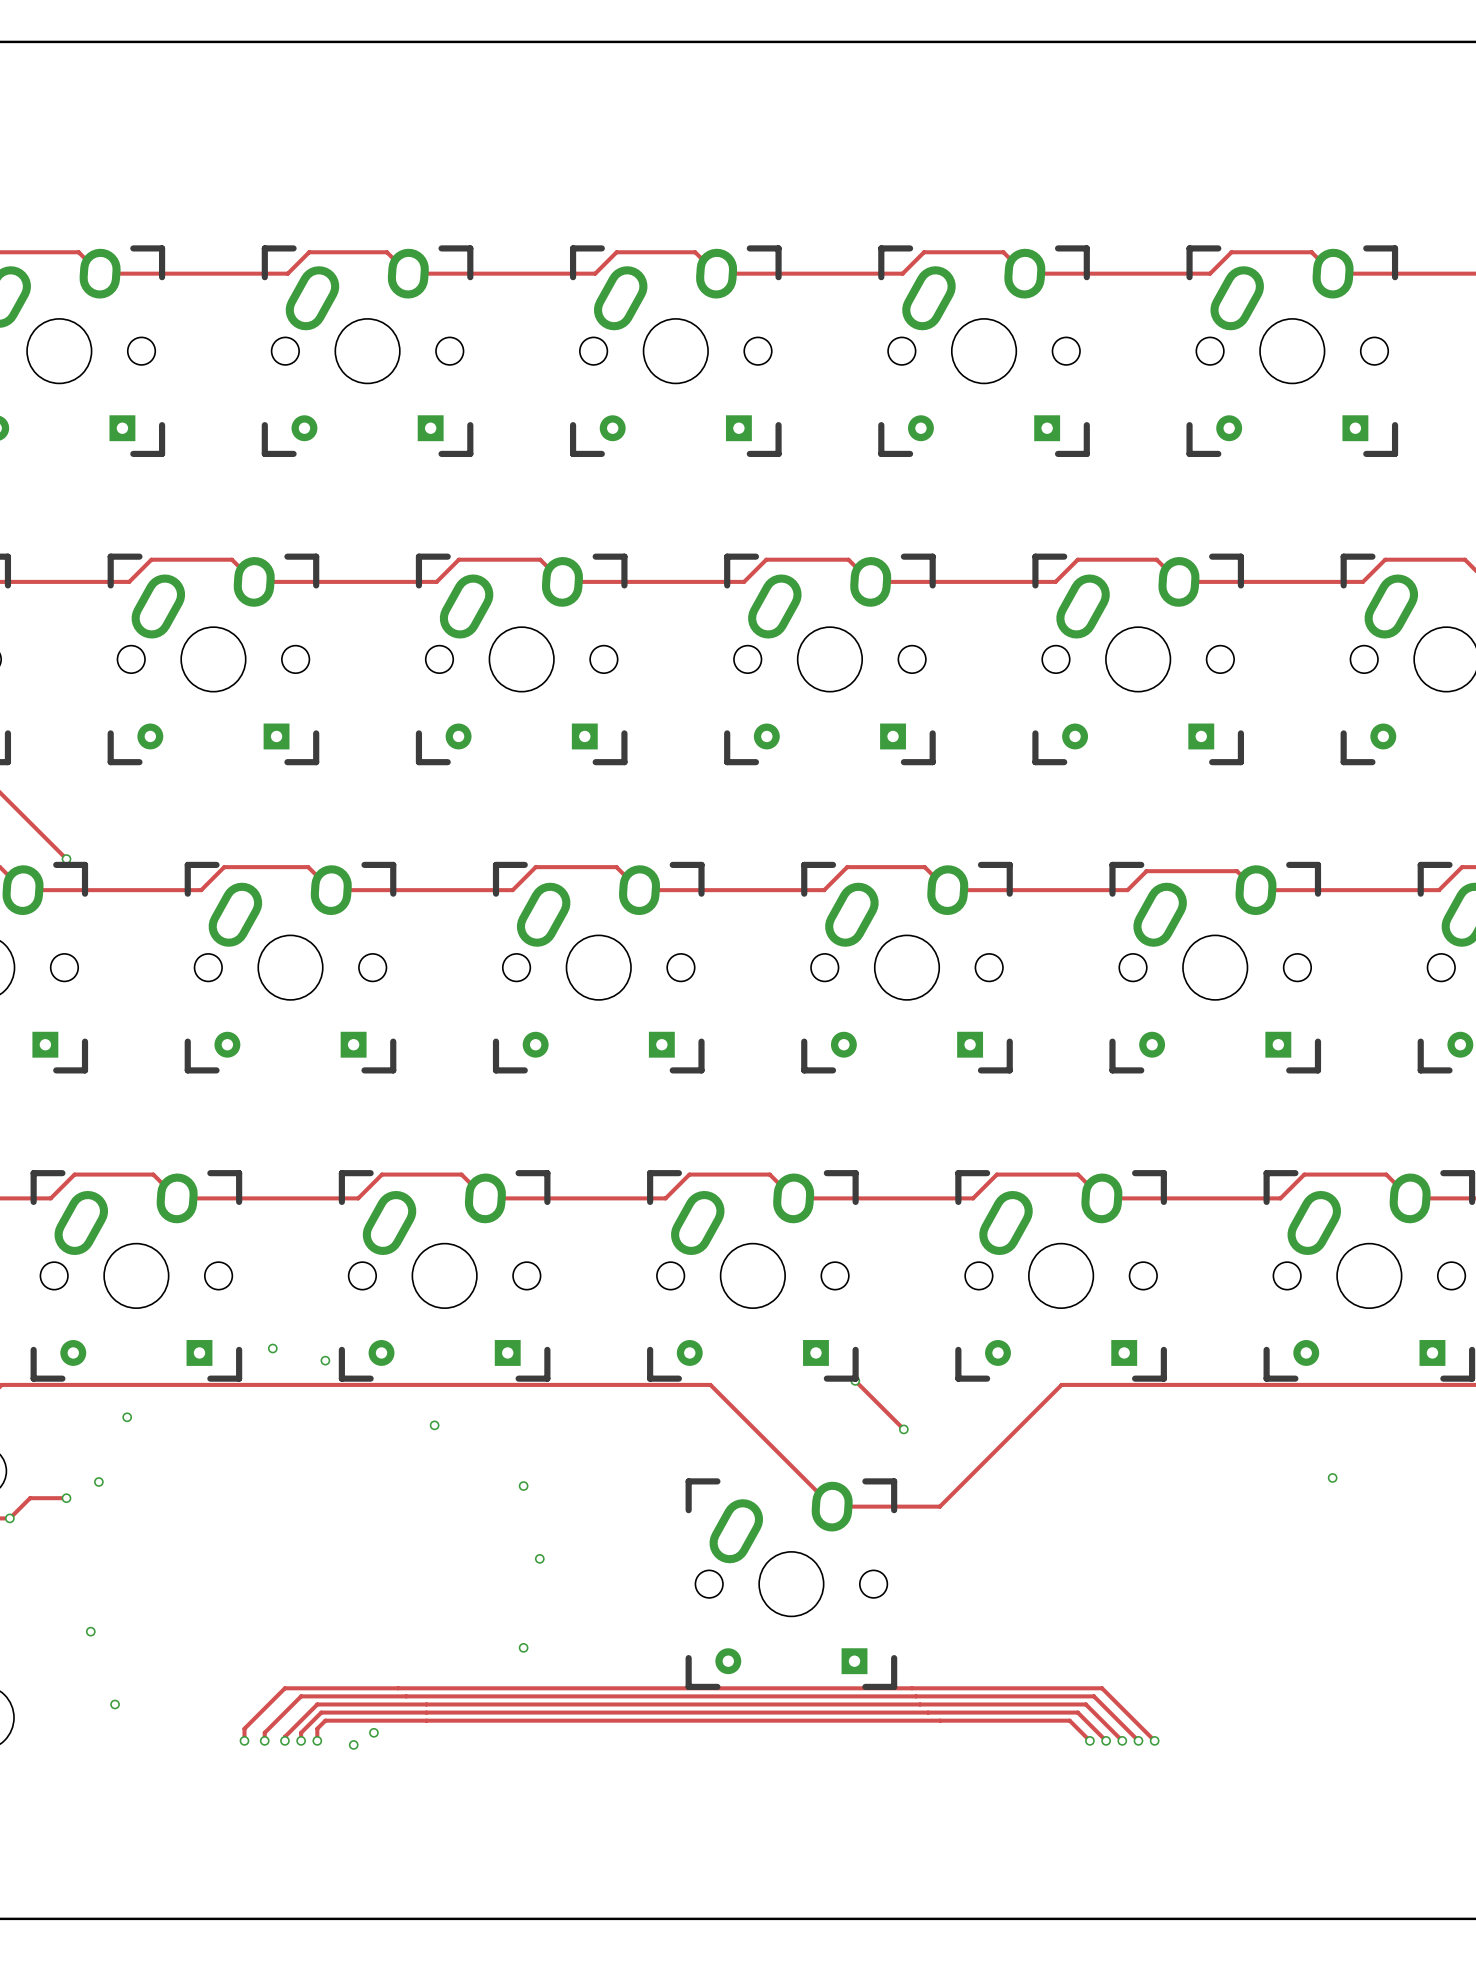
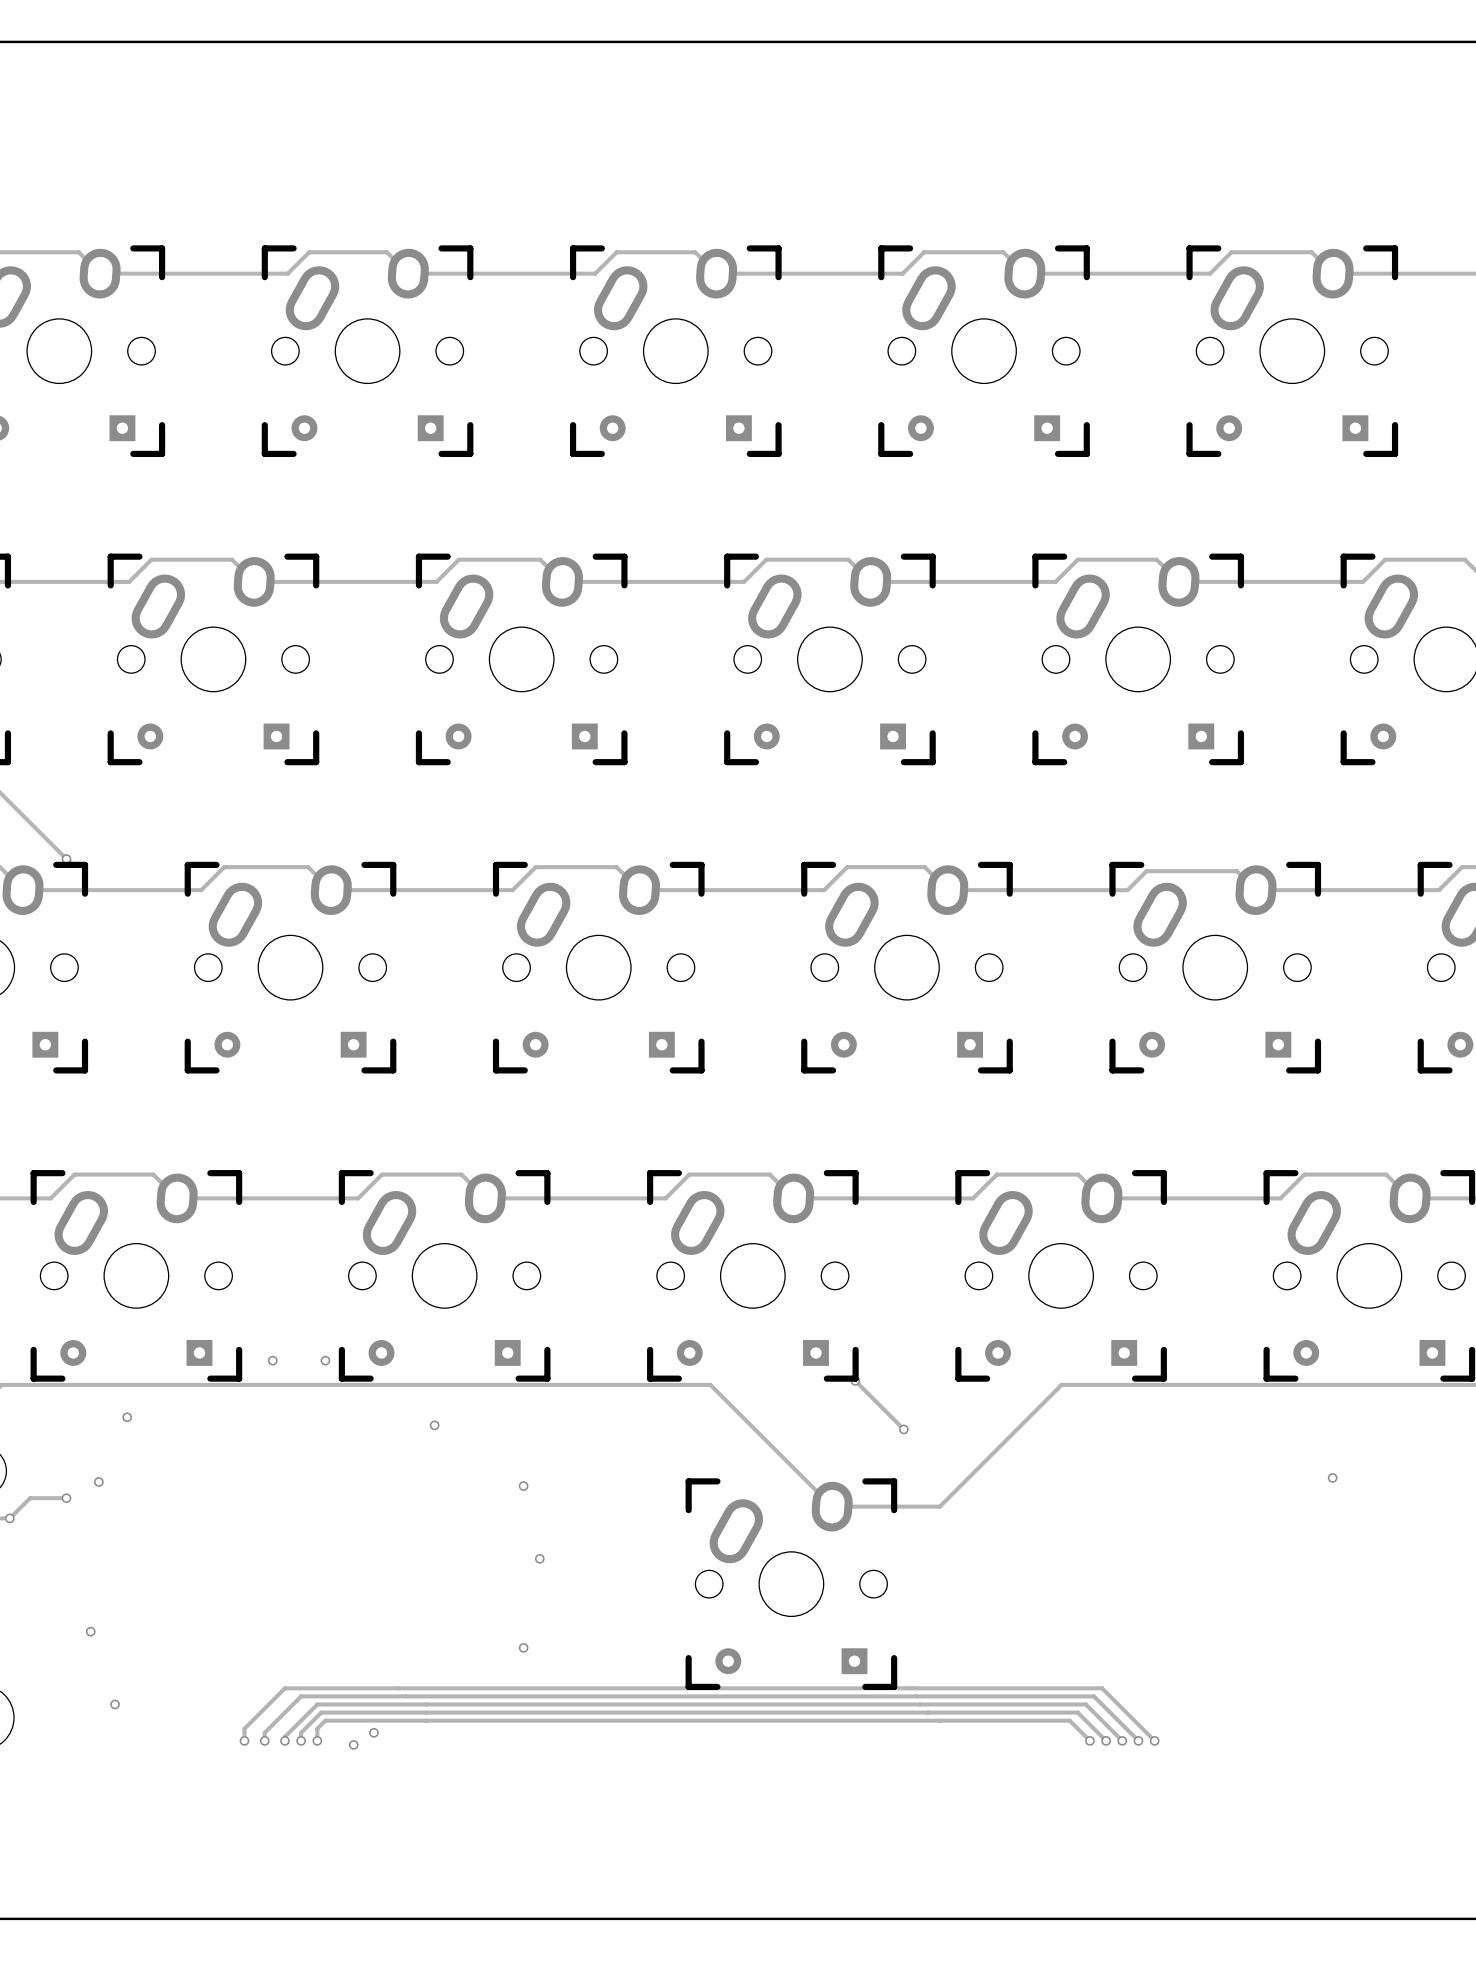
via position: (272, 1348) -> (272, 1360)

